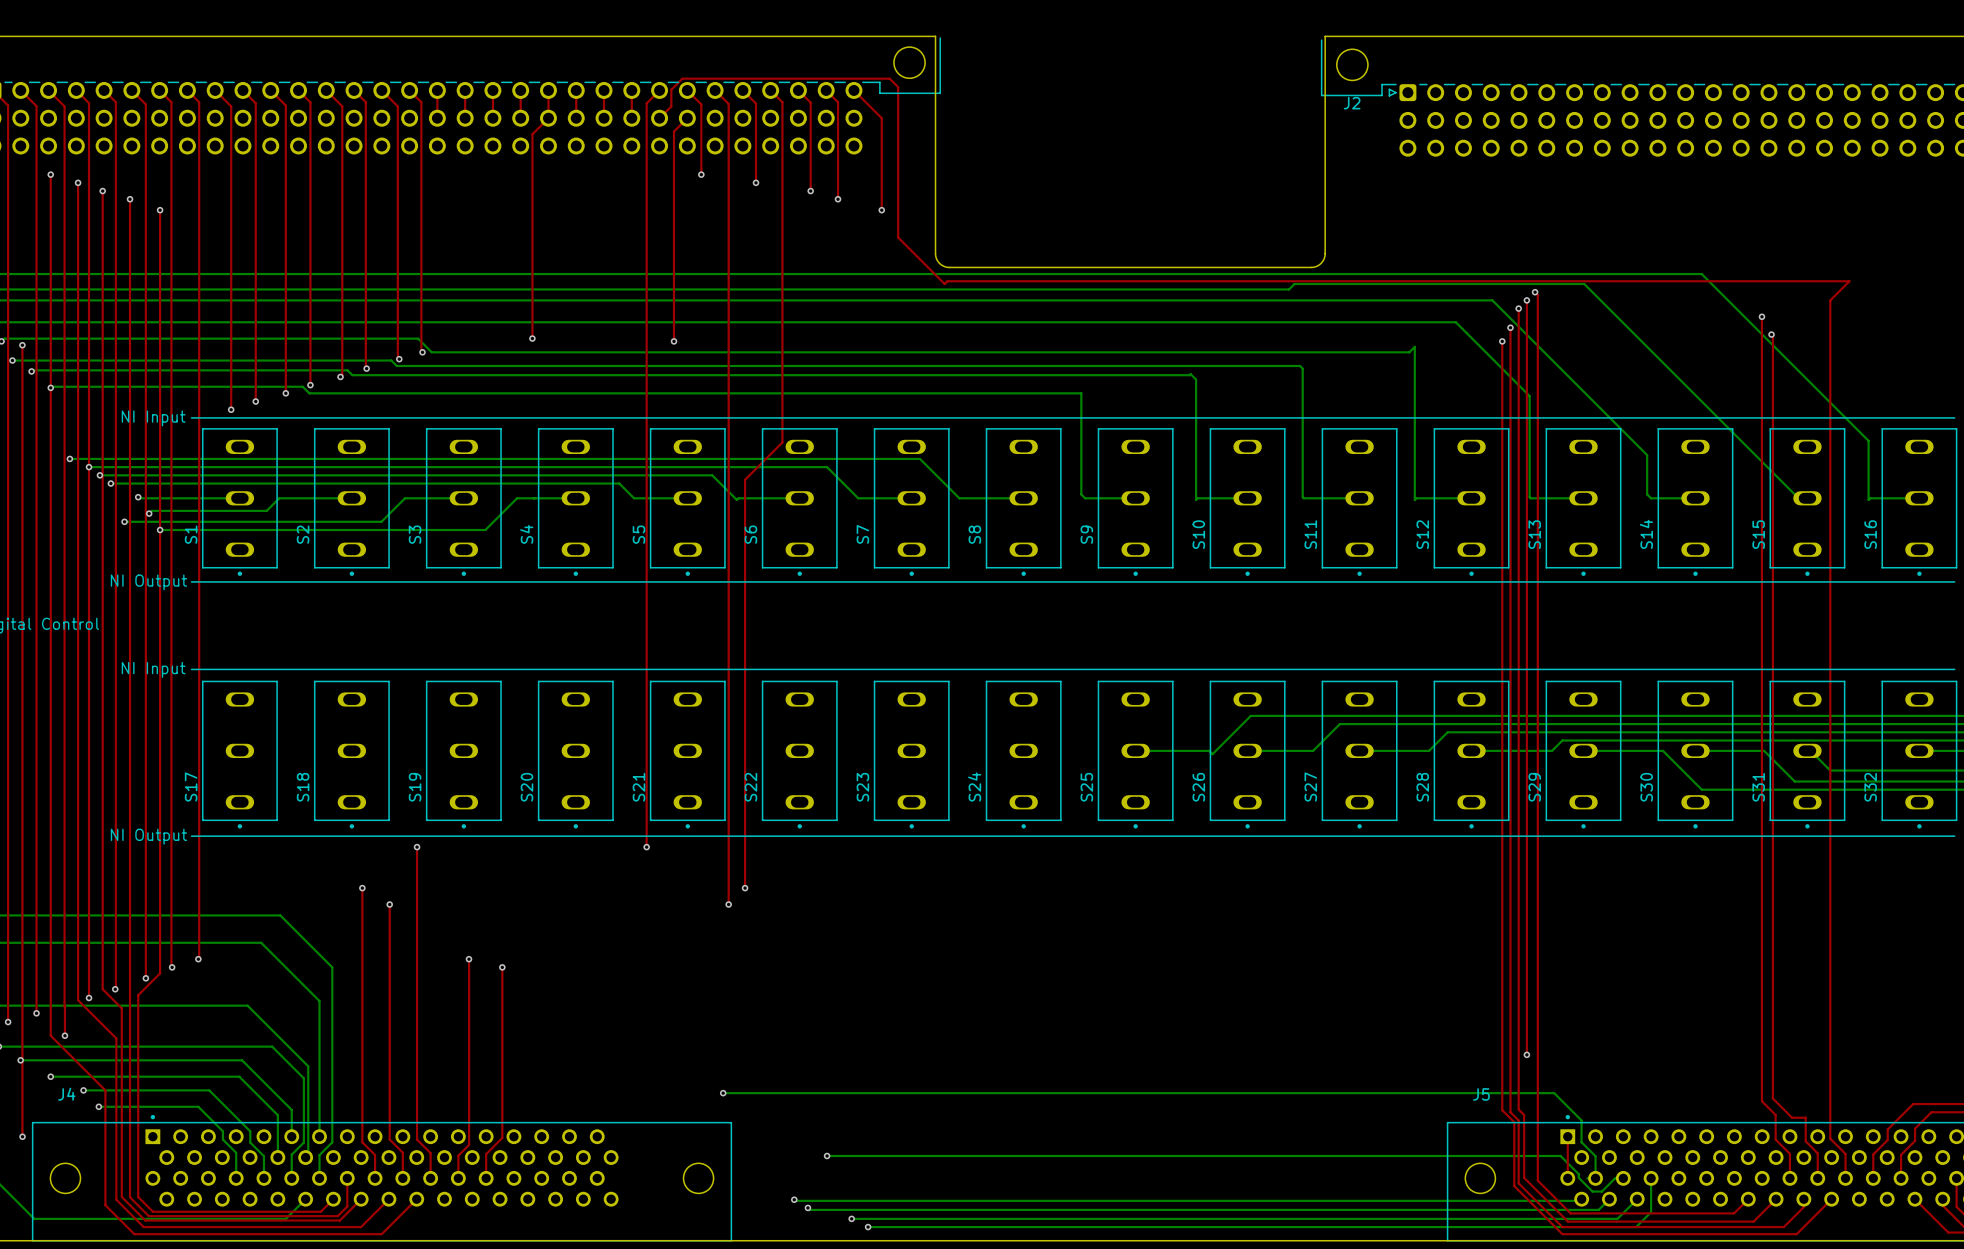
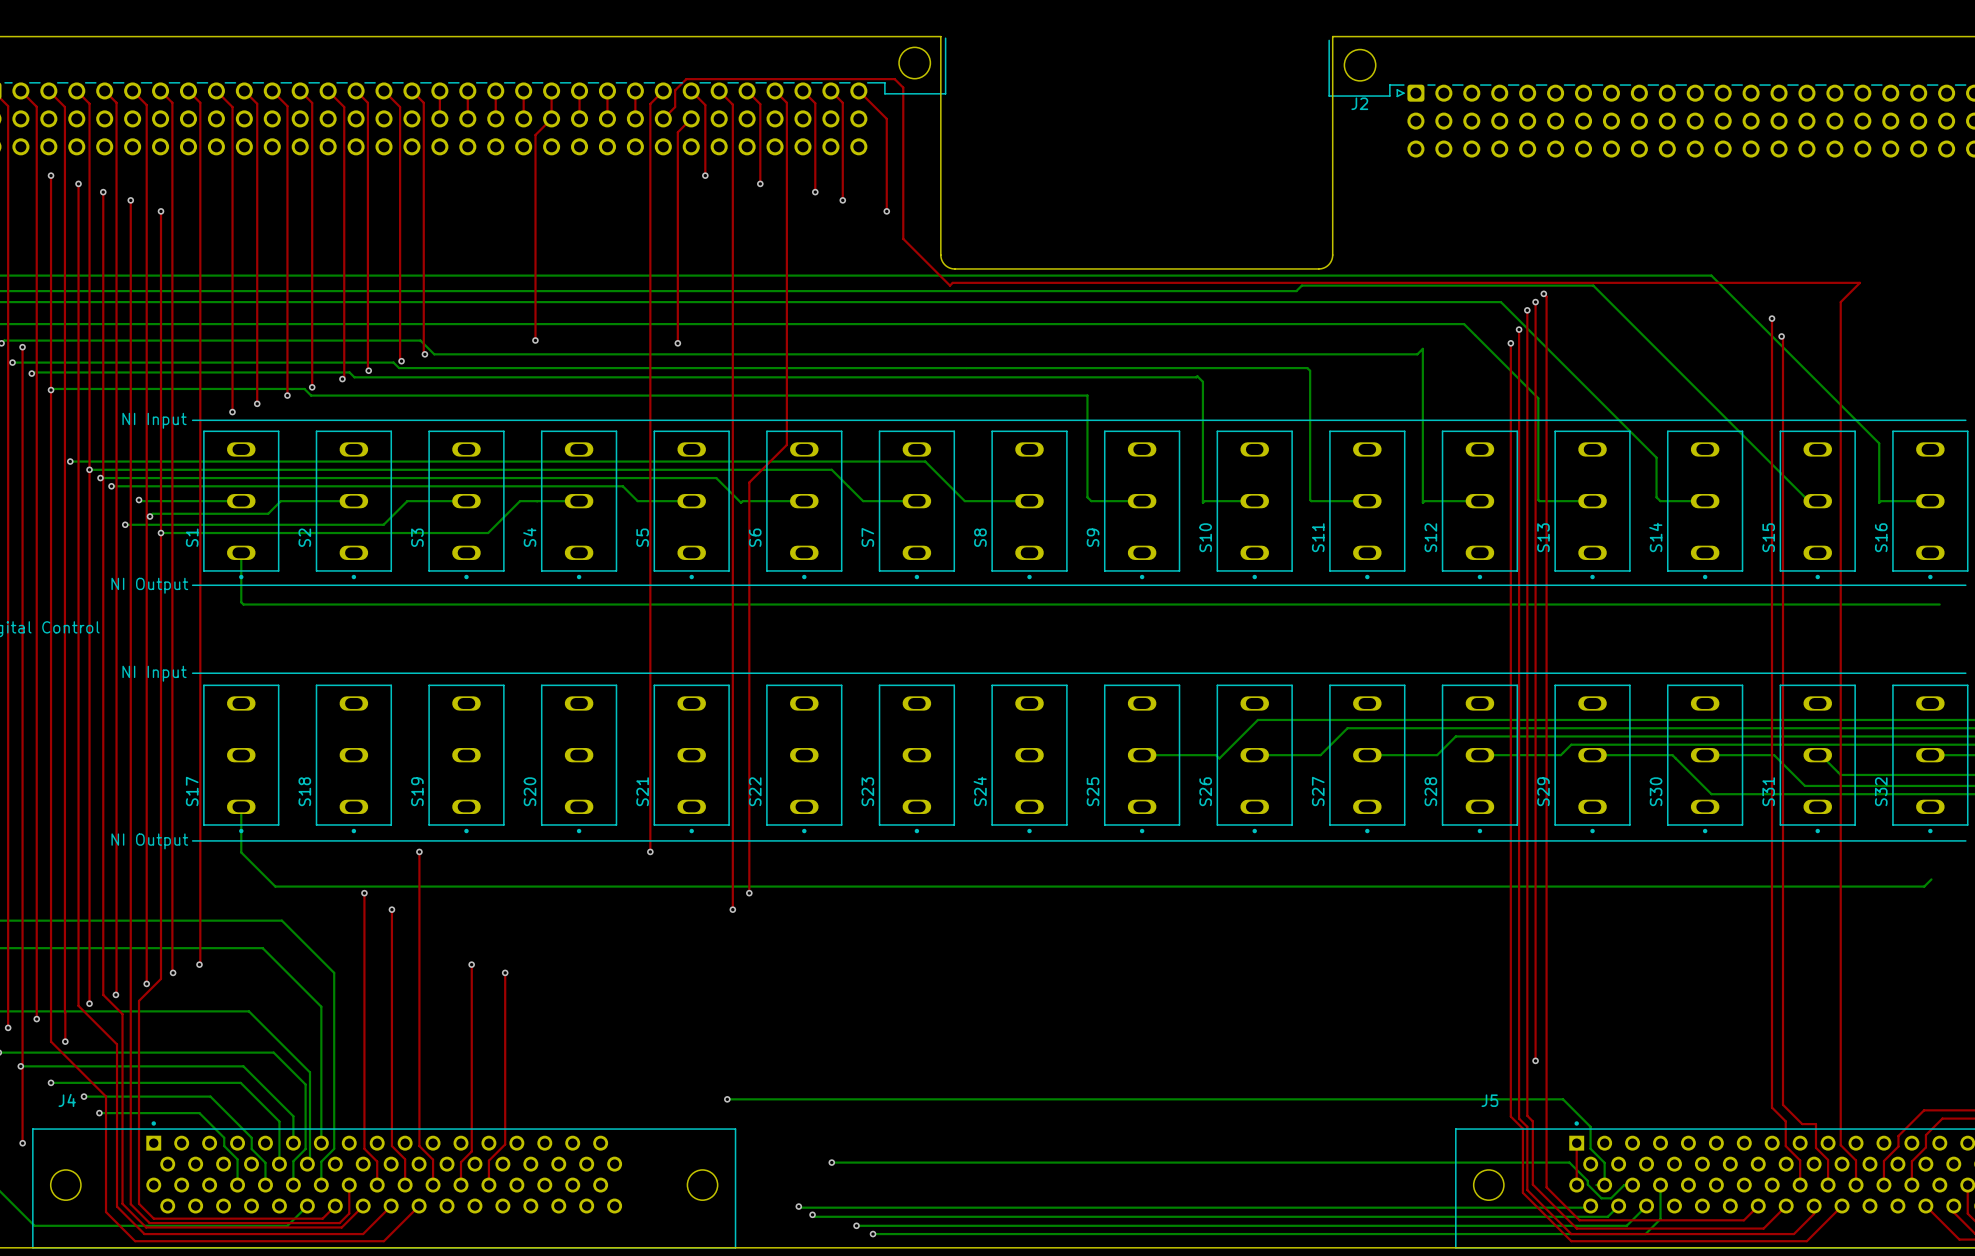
bottom track: none -> (241, 552) (241, 602) (243, 604) (1939, 604)
bottom track: none -> (241, 806) (241, 852) (275, 886) (1924, 886) (1931, 879)

